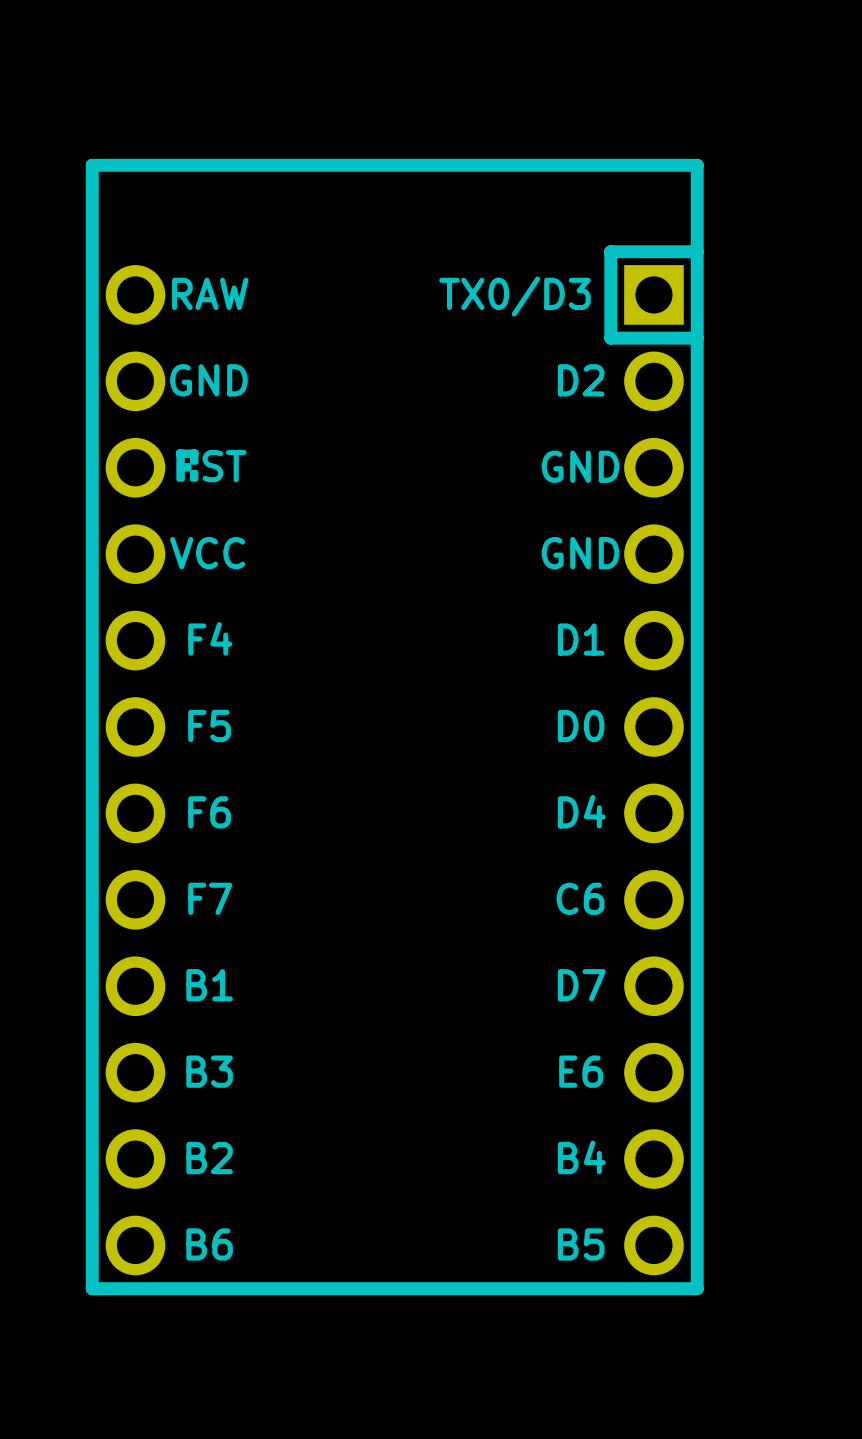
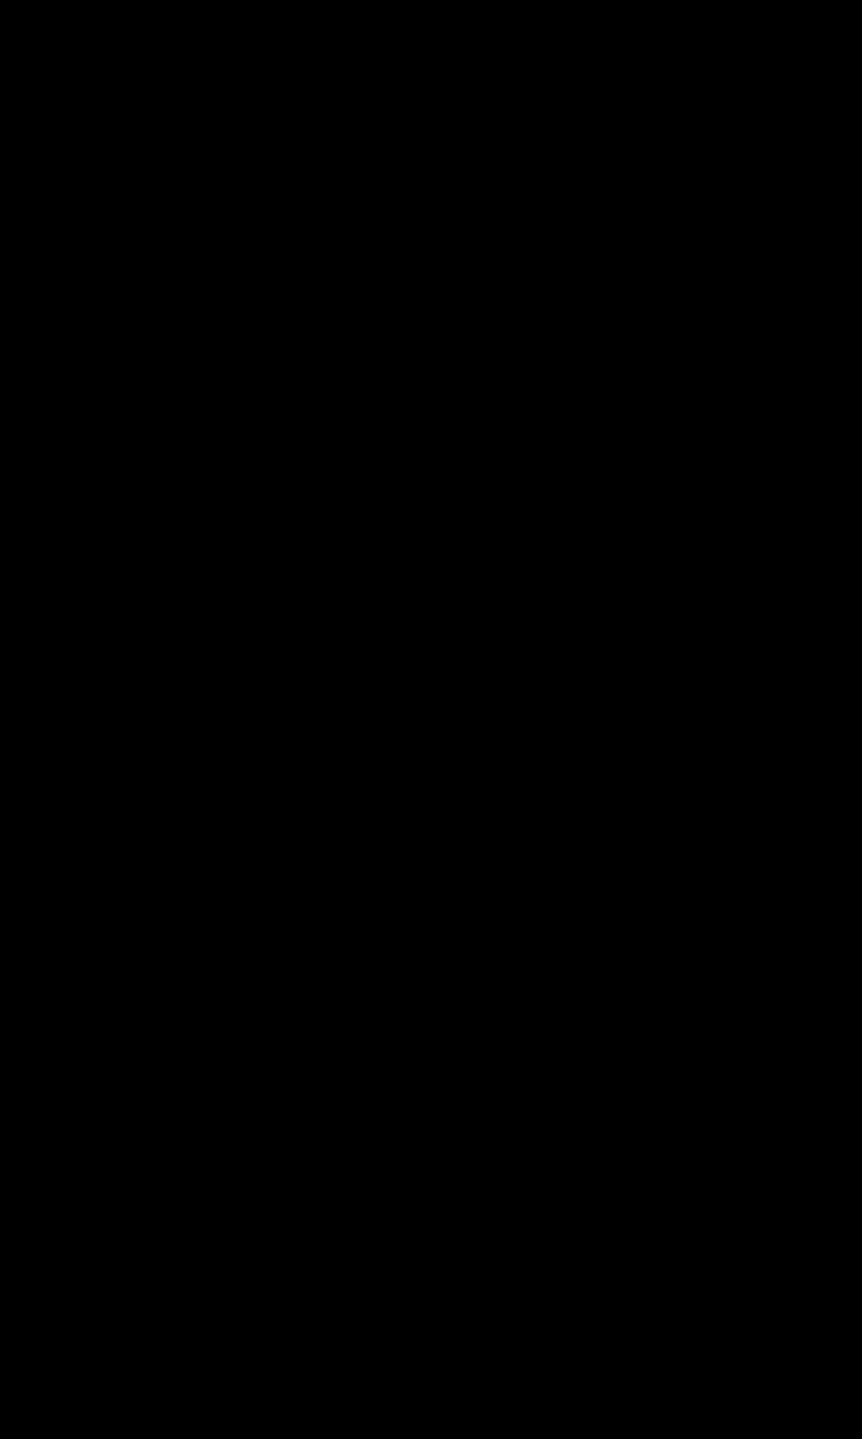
part: (394, 726) -> none

